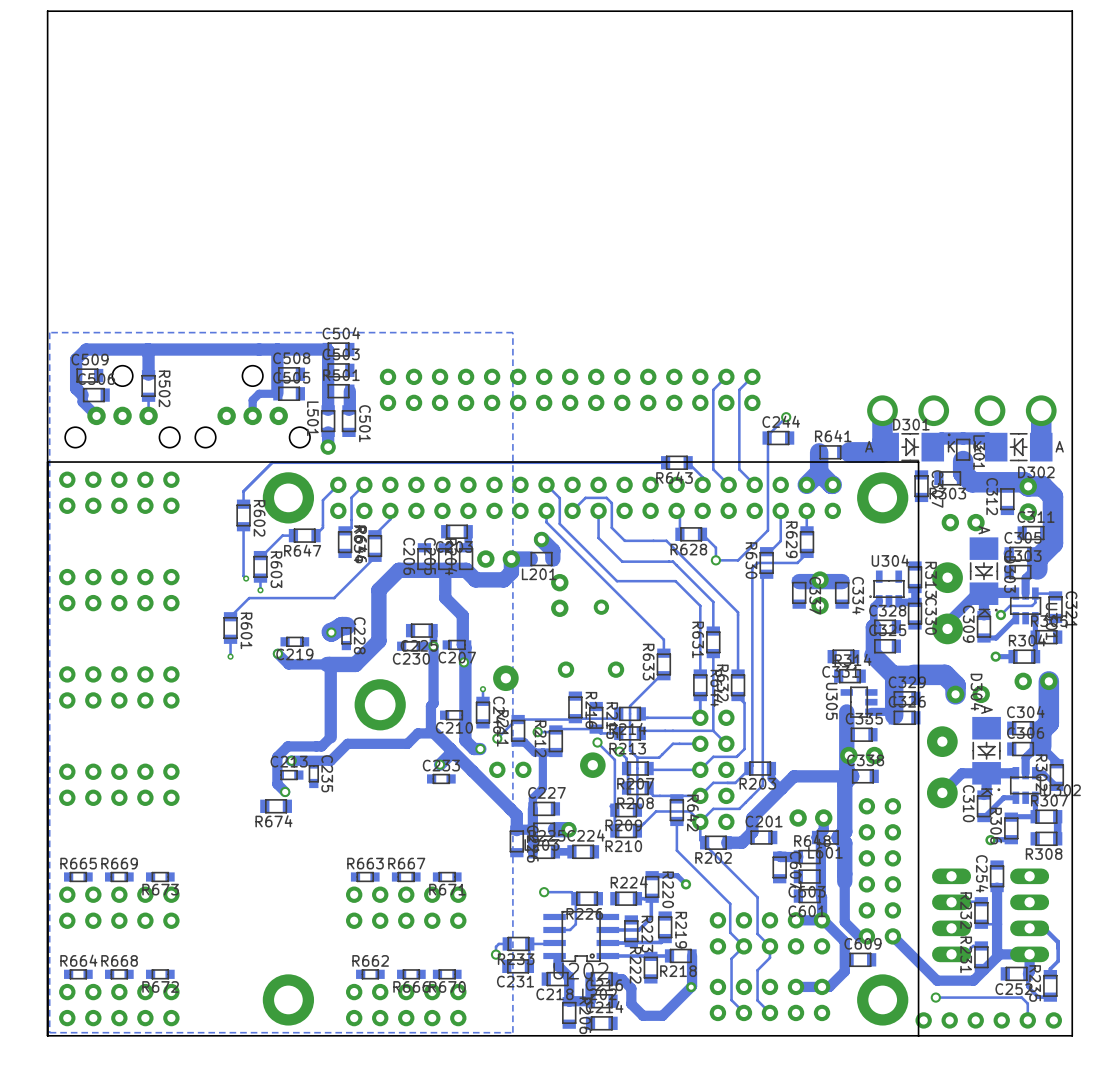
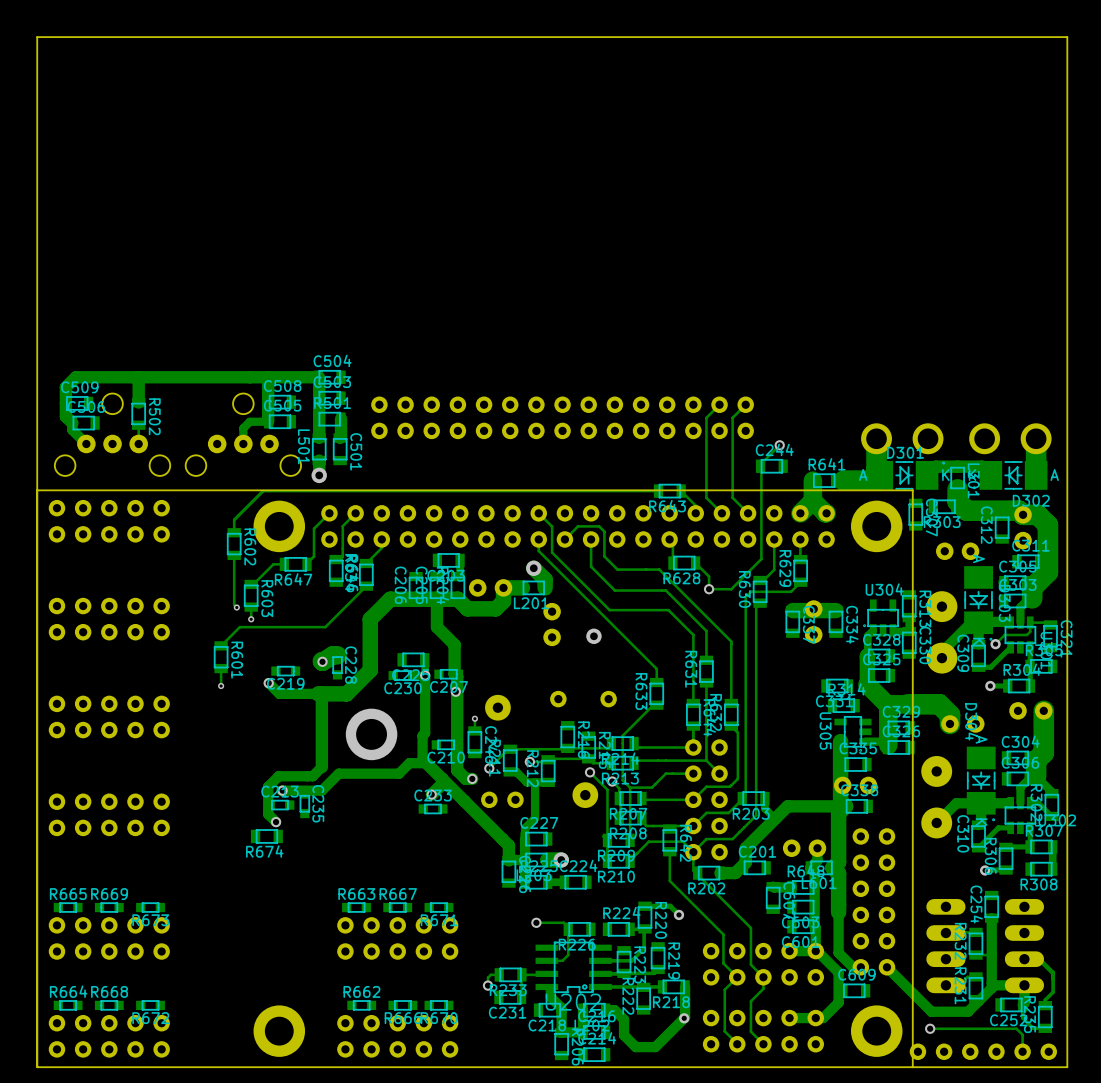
zone outline: (512, 332) (512, 1032) (49, 1032) (49, 332) (512, 332) -> none

